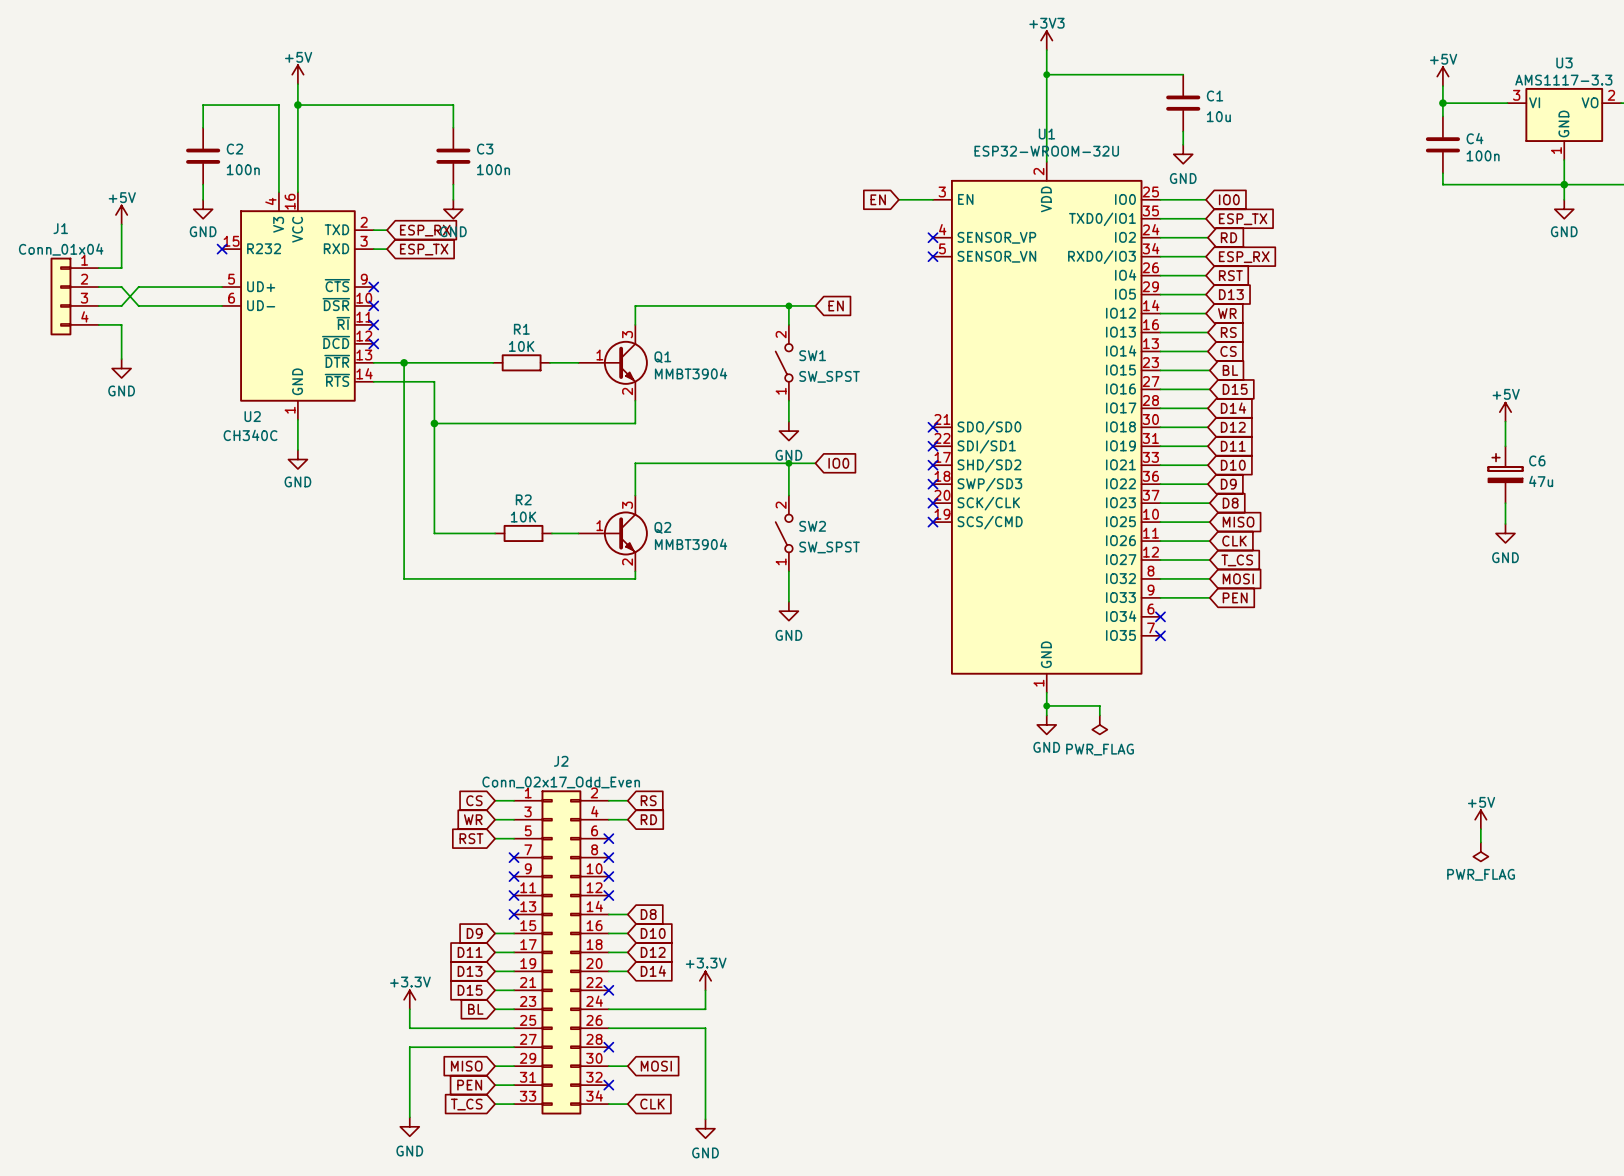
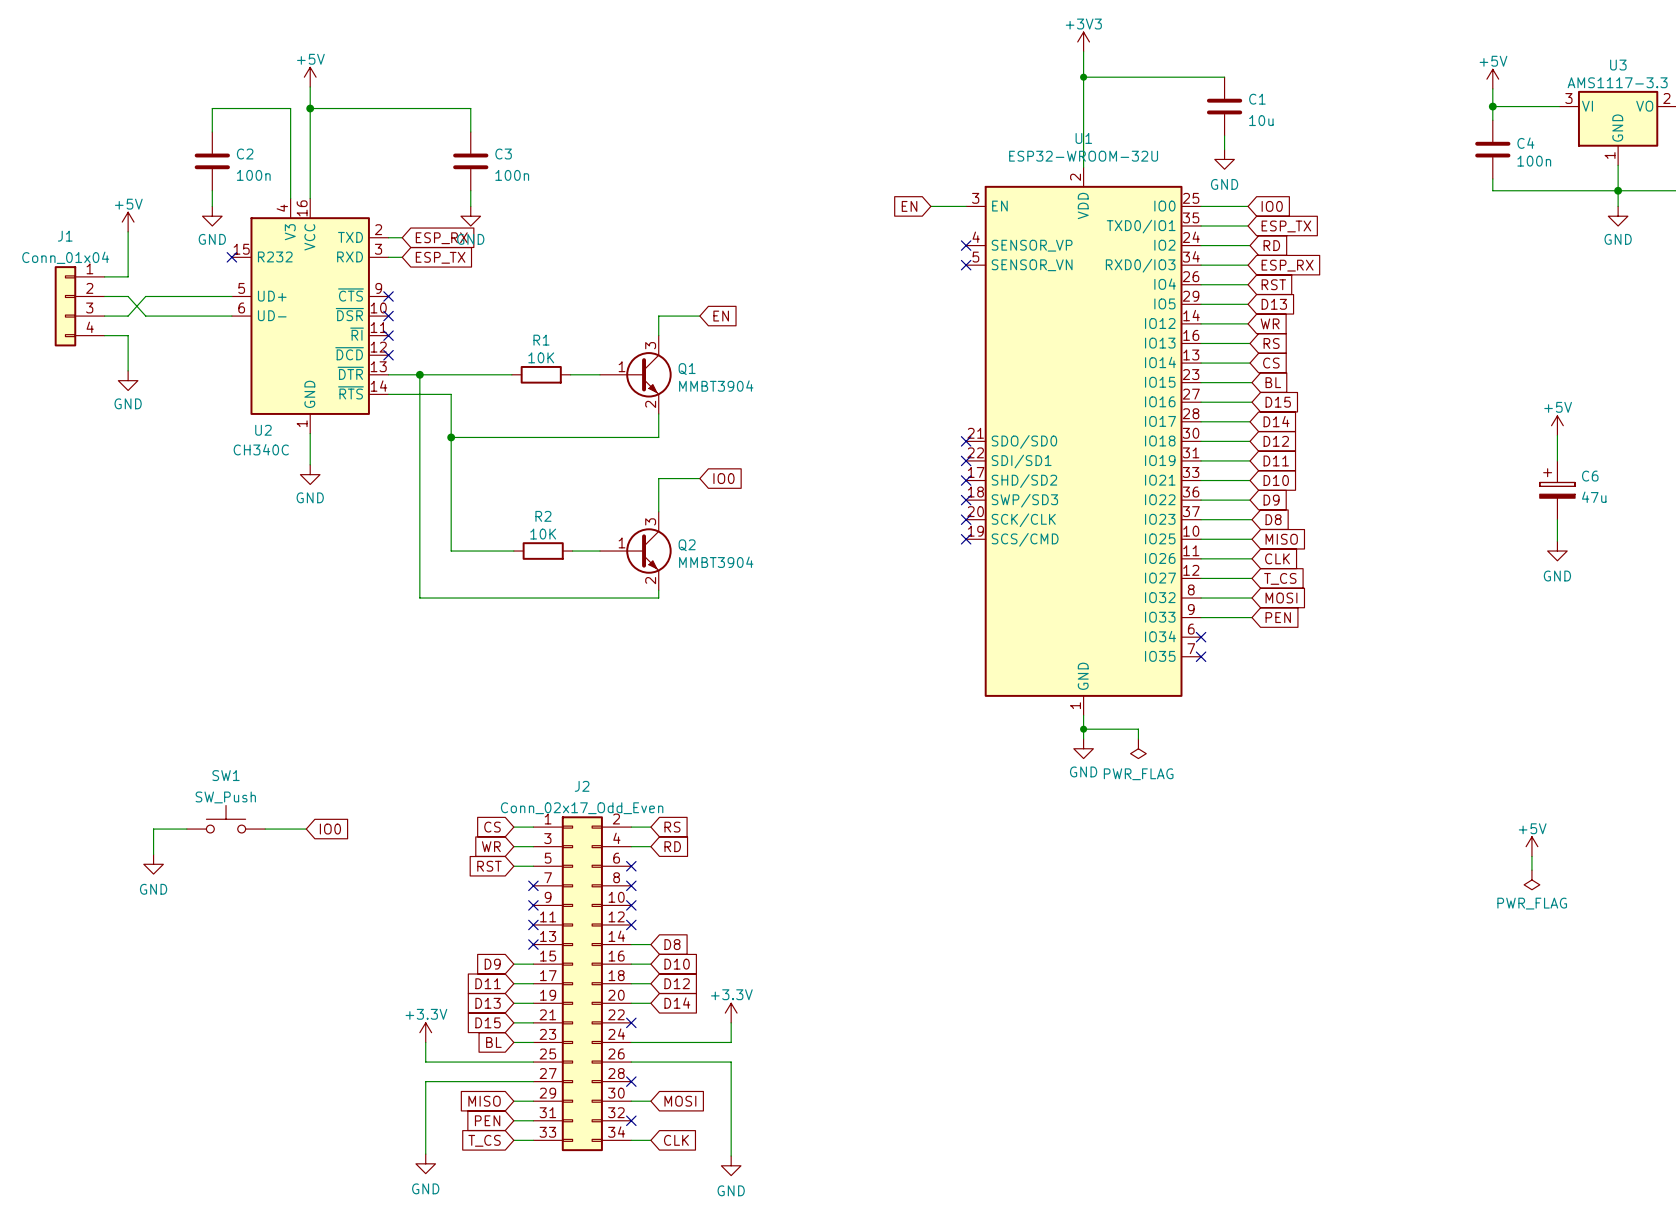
wire: (675, 305) (815, 305) -> none
wire: (788, 305) (788, 324) -> none
junction: (788, 305) -> none
global label position: EN (836, 305) -> EN (721, 316)
SW1 symbol: [775, 324, 793, 401] -> [186, 805, 266, 833]
SW1 name position: SW1 (812, 355) -> SW1 (226, 775)
SW1 value: SW_SPST (829, 376) -> SW_Push (225, 797)
wire: (788, 400) (788, 421) -> none
power symbol: GND (788, 431) -> none
wire: (675, 463) (815, 463) -> none
wire: (788, 463) (788, 495) -> none
junction: (788, 463) -> none
global label position: IO0 (838, 463) -> IO0 (723, 478)
SW2: SW_SPST (784, 533) -> none
wire: (788, 571) (788, 601) -> none
power symbol: GND (788, 611) -> none
wire: none -> (186, 829) (153, 829) (153, 854)
wire: none -> (265, 829) (306, 829)
global label: none -> IO0 (330, 829)
power symbol: none -> GND (153, 864)

